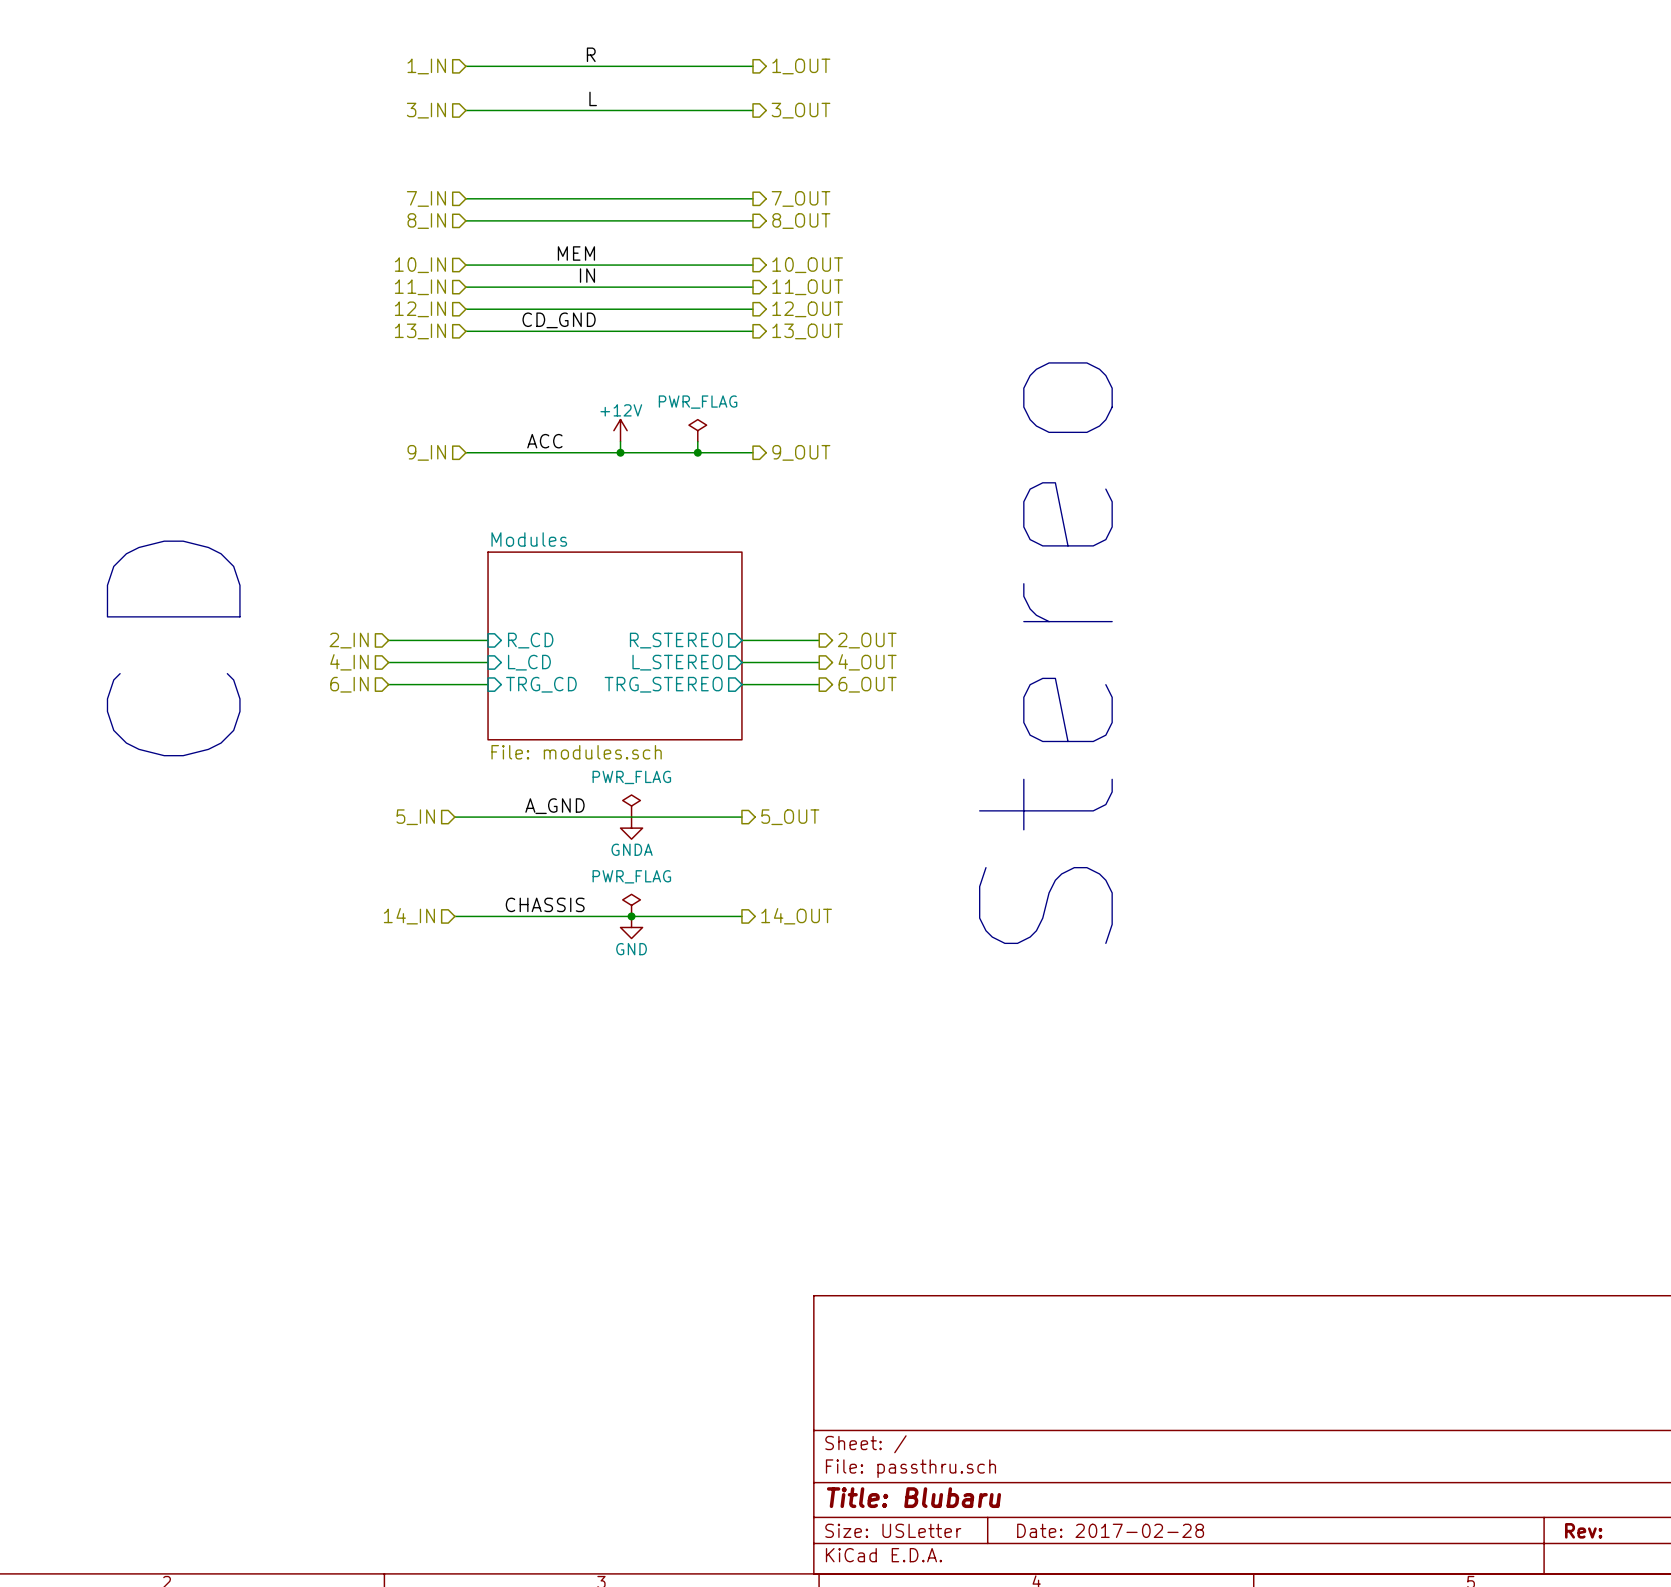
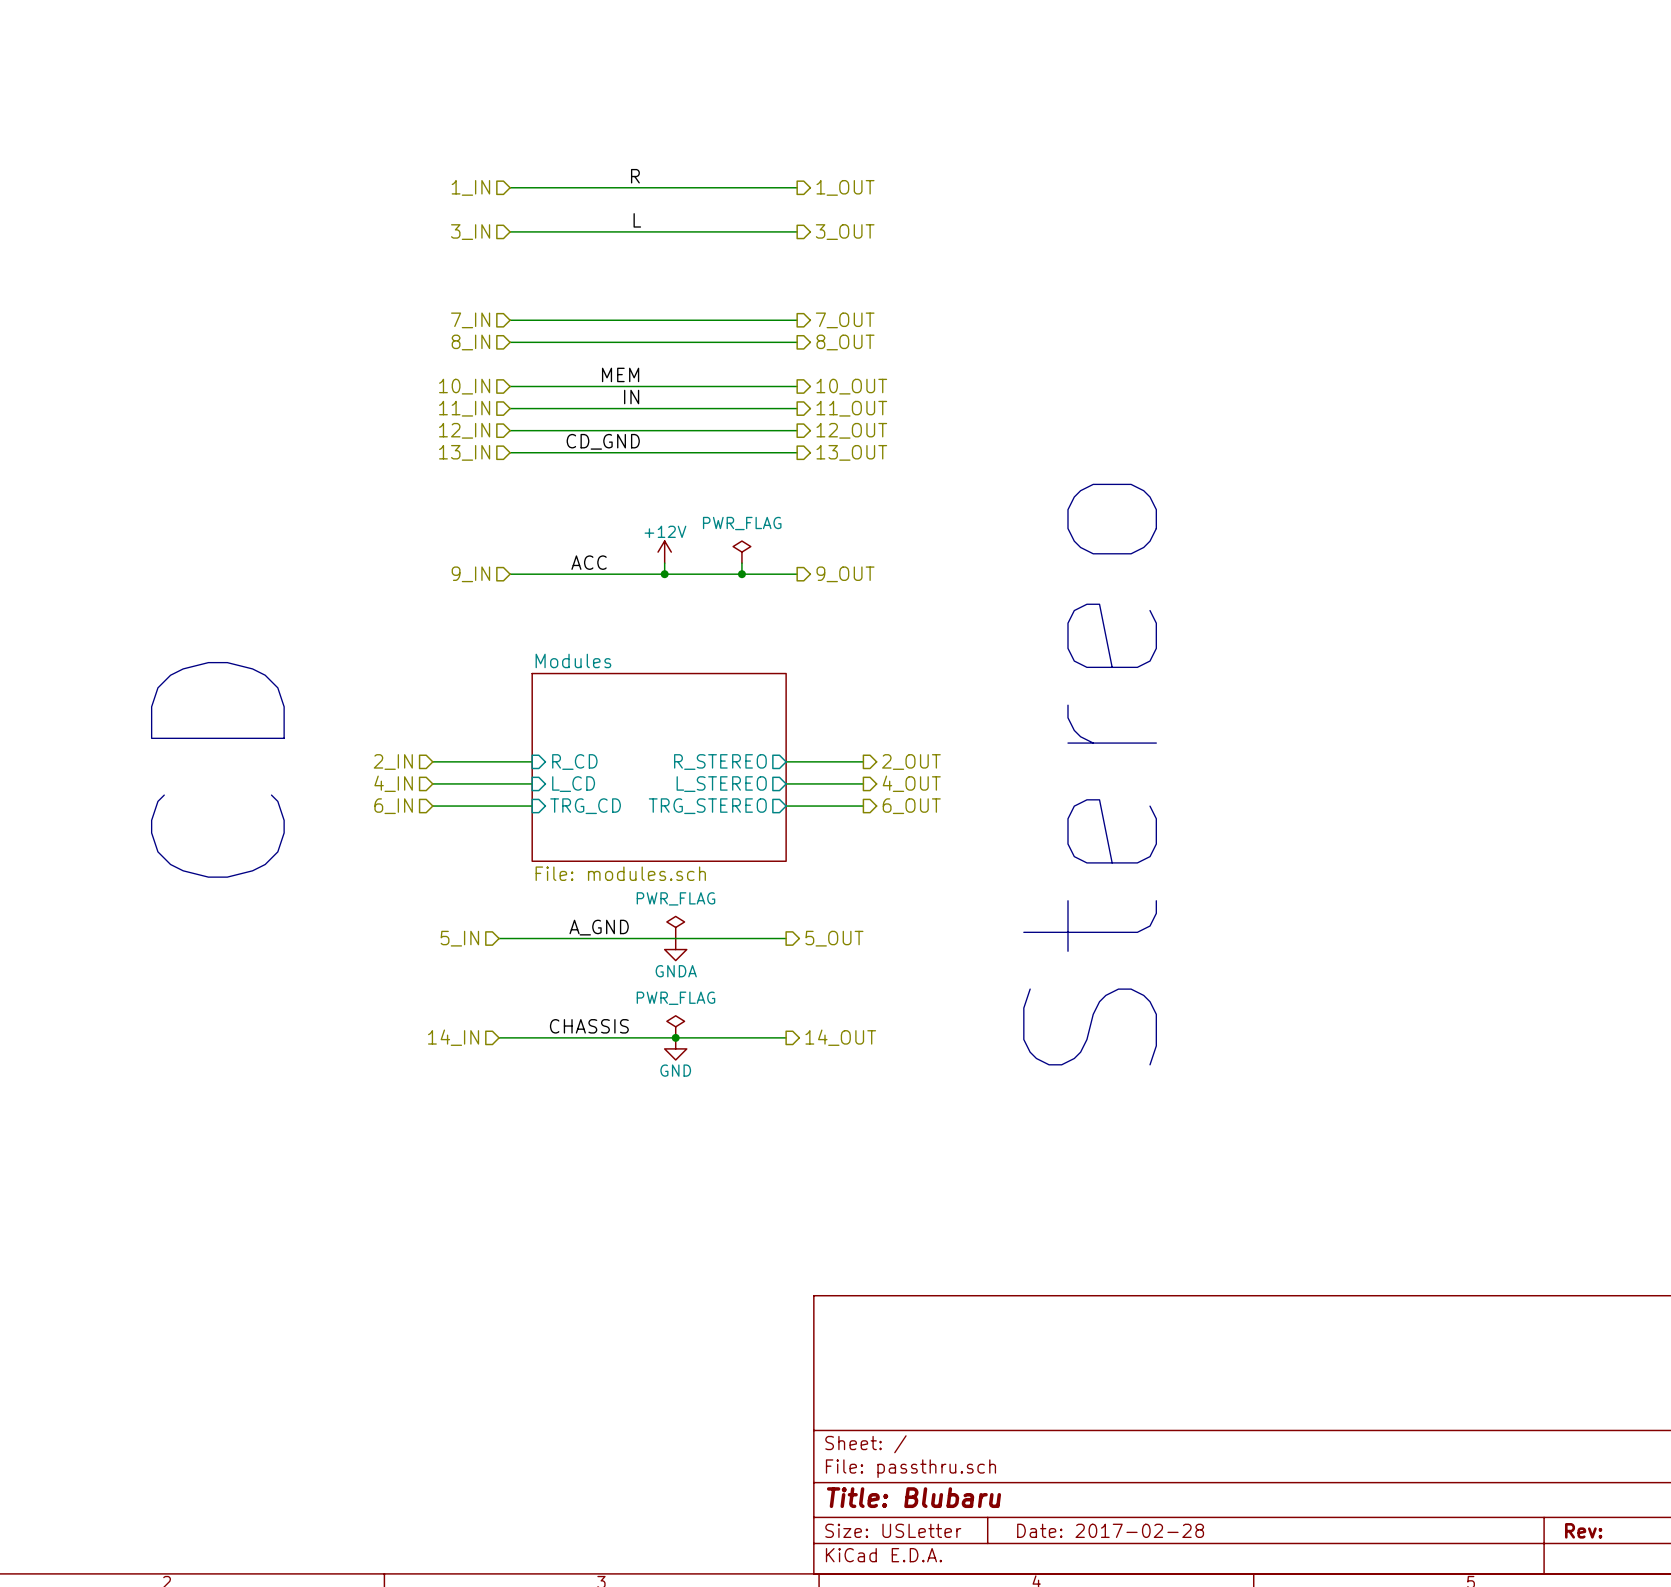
label position: R (591, 54) -> R (635, 176)
hierarchical label position: 1_IN (426, 66) -> 1_IN (470, 187)
wire: (465, 66) (752, 66) -> (510, 187) (797, 187)
hierarchical label position: 1_OUT (801, 66) -> 1_OUT (845, 187)
label position: L (593, 98) -> L (637, 220)
hierarchical label position: 3_IN (426, 110) -> 3_IN (470, 232)
wire: (465, 110) (752, 110) -> (510, 231) (797, 231)
hierarchical label position: 3_OUT (801, 110) -> 3_OUT (845, 232)
hierarchical label position: 7_IN (426, 198) -> 7_IN (470, 320)
wire: (465, 198) (752, 198) -> (510, 320) (797, 320)
hierarchical label position: 7_OUT (801, 198) -> 7_OUT (845, 320)
wire: (465, 220) (752, 220) -> (510, 342) (797, 342)
hierarchical label position: 8_IN (426, 221) -> 8_IN (470, 342)
hierarchical label position: 8_OUT (801, 221) -> 8_OUT (845, 342)
label position: MEM (576, 253) -> MEM (620, 374)
hierarchical label position: 10_IN (420, 265) -> 10_IN (464, 386)
wire: (465, 265) (752, 265) -> (510, 386) (797, 386)
hierarchical label position: 10_OUT (807, 265) -> 10_OUT (851, 386)
label position: IN (587, 275) -> IN (631, 397)
hierarchical label position: 11_IN (420, 287) -> 11_IN (464, 408)
wire: (465, 287) (752, 287) -> (510, 408) (797, 408)
hierarchical label position: 11_OUT (807, 287) -> 11_OUT (851, 408)
hierarchical label position: 12_IN (420, 309) -> 12_IN (464, 430)
wire: (465, 309) (752, 309) -> (510, 430) (797, 430)
hierarchical label position: 12_OUT (807, 309) -> 12_OUT (851, 430)
label position: CD_GND (559, 320) -> CD_GND (603, 441)
hierarchical label position: 13_IN (420, 331) -> 13_IN (464, 452)
wire: (465, 331) (752, 331) -> none
hierarchical label position: 13_OUT (807, 331) -> 13_OUT (851, 452)
power symbol position: +12V (620, 430) -> +12V (664, 552)
power symbol position: PWR_FLAG (697, 430) -> PWR_FLAG (741, 552)
label position: ACC (544, 441) -> ACC (589, 562)
wire: (620, 441) (620, 452) -> (664, 563) (664, 574)
hierarchical label position: 9_IN (426, 452) -> 9_IN (470, 574)
wire: (465, 452) (510, 452) -> none
junction: (620, 452) -> none
junction: (697, 452) -> none
wire: none -> (752, 452) (797, 452)
hierarchical label position: 9_OUT (801, 452) -> 9_OUT (845, 574)
wire: none -> (510, 574) (797, 574)
junction: none -> (664, 574)
junction: none -> (741, 574)
hierarchical label position: 2_IN (349, 640) -> 2_IN (393, 762)
wire: (388, 640) (488, 640) -> (432, 761) (532, 761)
sheet pin position: R_CD (530, 640) -> R_CD (574, 762)
sheet pin position: R_STEREO (676, 640) -> R_STEREO (720, 762)
wire: (741, 640) (819, 640) -> (786, 761) (863, 761)
hierarchical label position: 2_OUT (867, 640) -> 2_OUT (911, 762)
sheet Modules position: (614, 645) -> (659, 767)
text position: CD (173, 648) -> CD (217, 769)
text position: Stereo (1045, 653) -> Stereo (1090, 774)
hierarchical label position: 4_IN (349, 662) -> 4_IN (393, 783)
wire: (388, 662) (488, 662) -> (432, 783) (532, 783)
sheet pin position: L_CD (529, 662) -> L_CD (573, 784)
sheet pin position: L_STEREO (677, 662) -> L_STEREO (721, 784)
wire: (741, 662) (819, 662) -> (786, 783) (863, 783)
hierarchical label position: 4_OUT (867, 662) -> 4_OUT (911, 783)
hierarchical label position: 6_IN (349, 684) -> 6_IN (393, 806)
wire: (388, 684) (488, 684) -> (432, 806) (532, 806)
sheet pin position: TRG_CD (541, 684) -> TRG_CD (585, 806)
sheet pin position: TRG_STEREO (663, 684) -> TRG_STEREO (707, 806)
wire: (741, 684) (819, 684) -> (786, 806) (863, 806)
hierarchical label position: 6_OUT (867, 684) -> 6_OUT (911, 806)
label position: A_GND (554, 806) -> A_GND (599, 927)
power symbol: PWR_FLAG (631, 806) -> none
hierarchical label position: 5_IN (415, 817) -> 5_IN (459, 938)
wire: (454, 817) (741, 817) -> (499, 938) (786, 938)
hierarchical label position: 5_OUT (790, 817) -> 5_OUT (834, 938)
power symbol position: GNDA (631, 828) -> GNDA (675, 949)
label position: CHASSIS (545, 904) -> CHASSIS (589, 1026)
power symbol position: PWR_FLAG (631, 905) -> PWR_FLAG (675, 927)
hierarchical label position: 14_IN (409, 916) -> 14_IN (453, 1037)
wire: (454, 916) (741, 916) -> (499, 1037) (786, 1037)
junction: (631, 916) -> none
hierarchical label position: 14_OUT (796, 916) -> 14_OUT (840, 1037)
power symbol position: GND (631, 927) -> GND (675, 1048)
power symbol: none -> PWR_FLAG (675, 1026)
junction: none -> (675, 1037)

